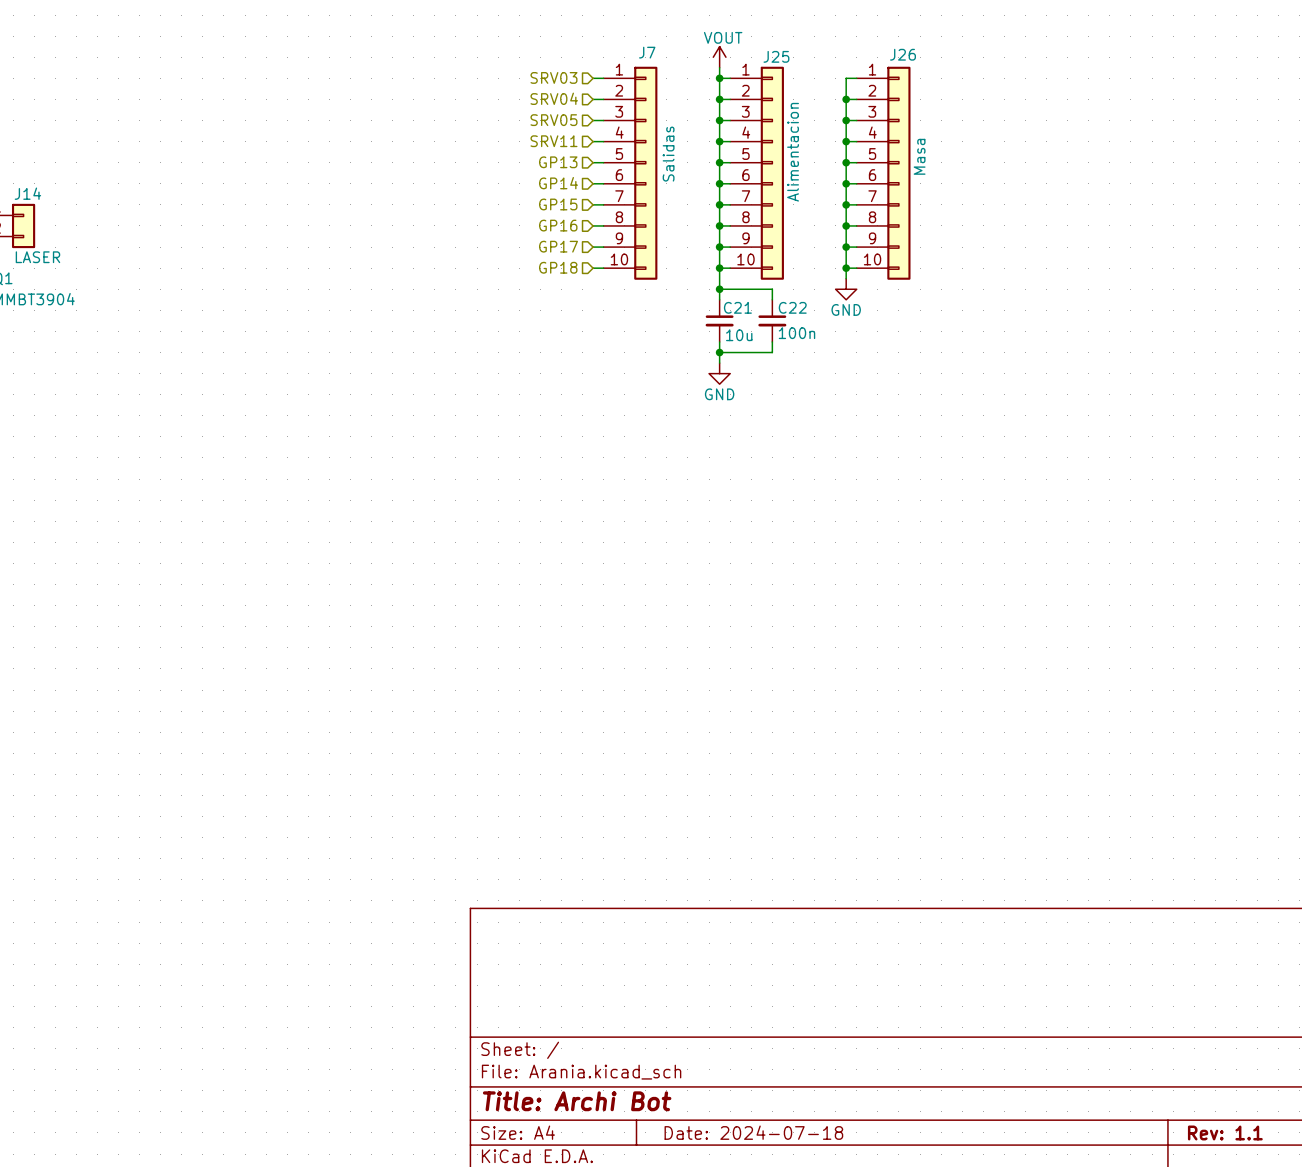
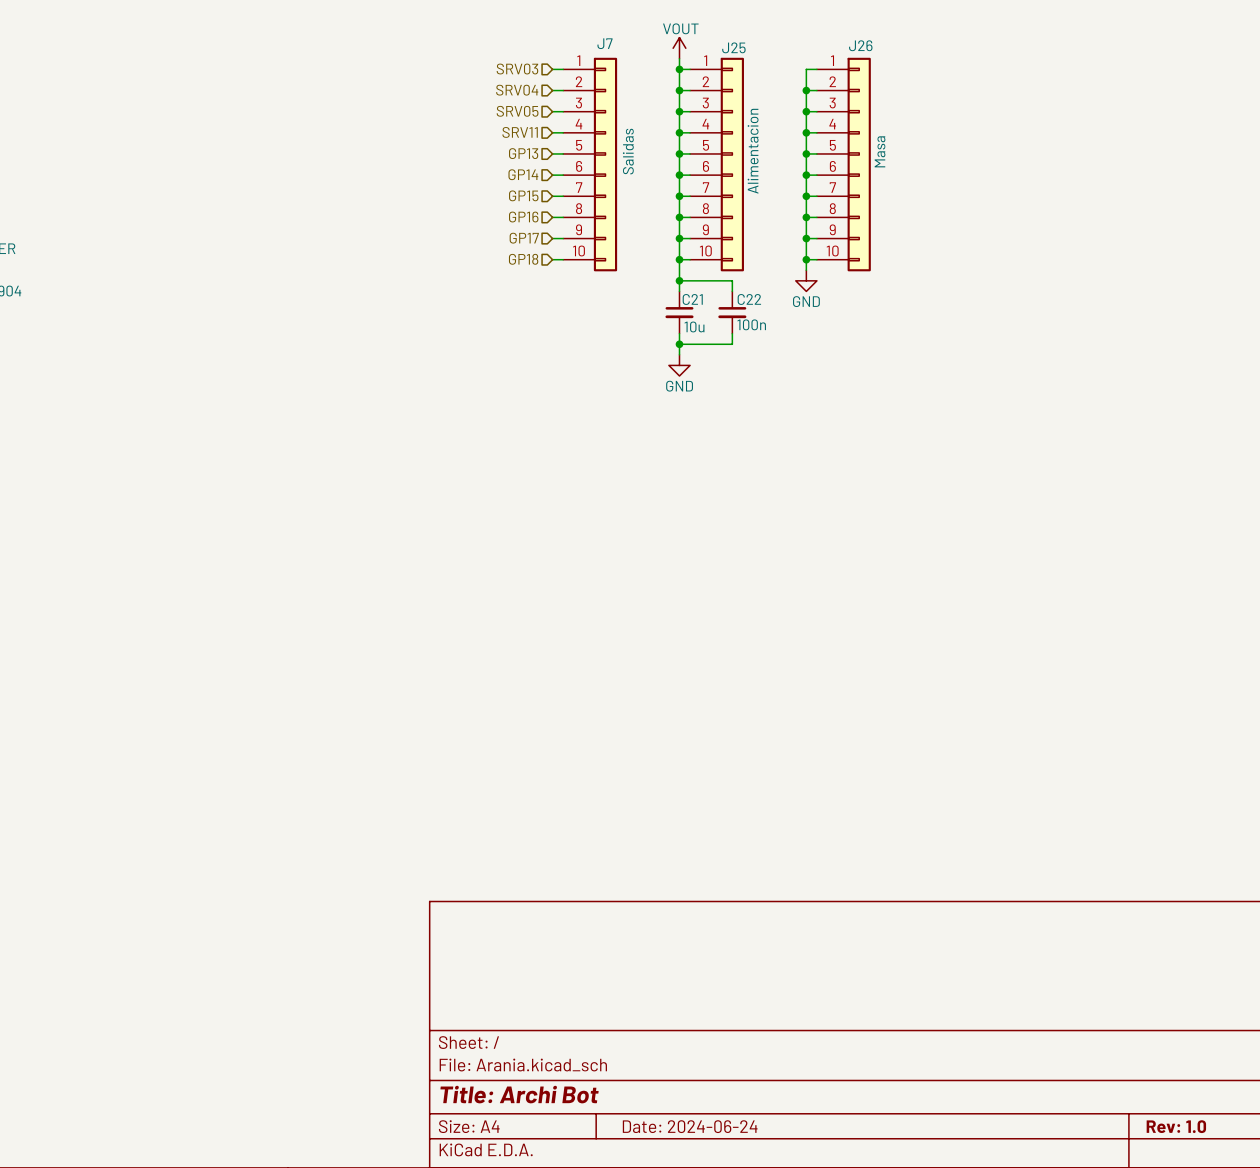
title block: Date: 2024-07-18 (753, 1132) -> Date: 2024-06-24 (690, 1126)
title block: Rev: 1.1 (1225, 1132) -> Rev: 1.0 (1176, 1126)

